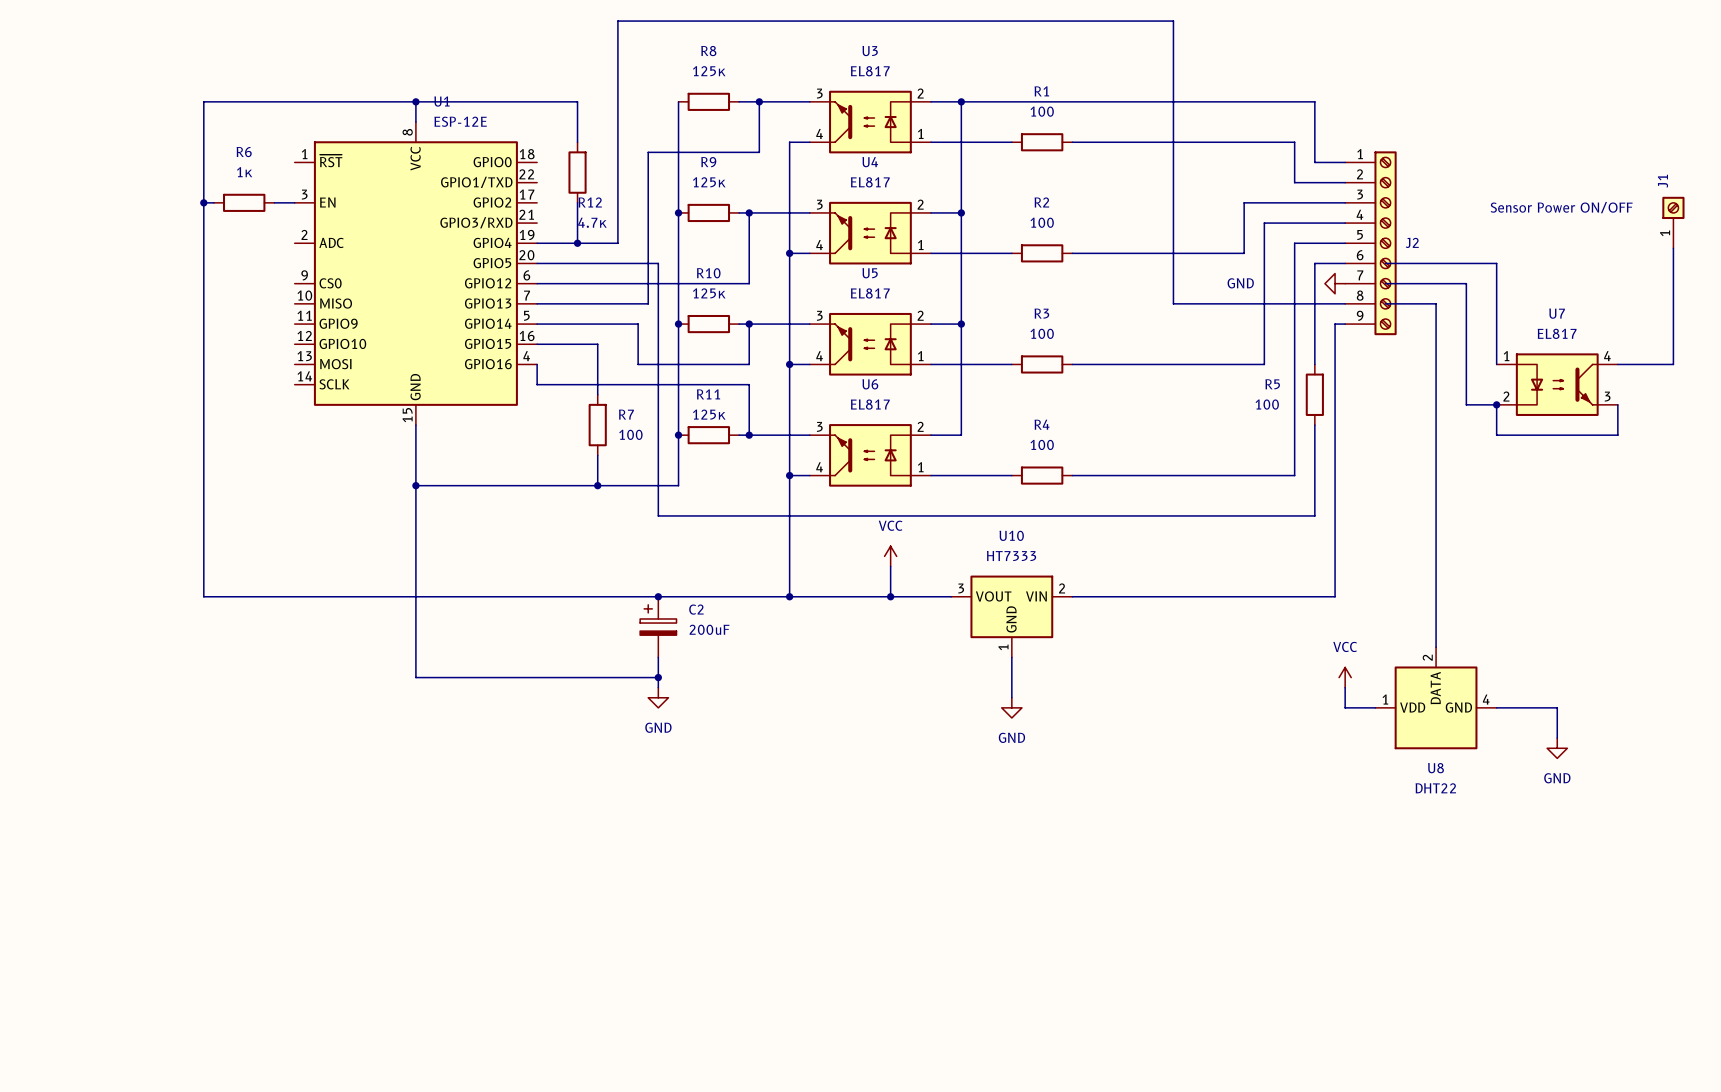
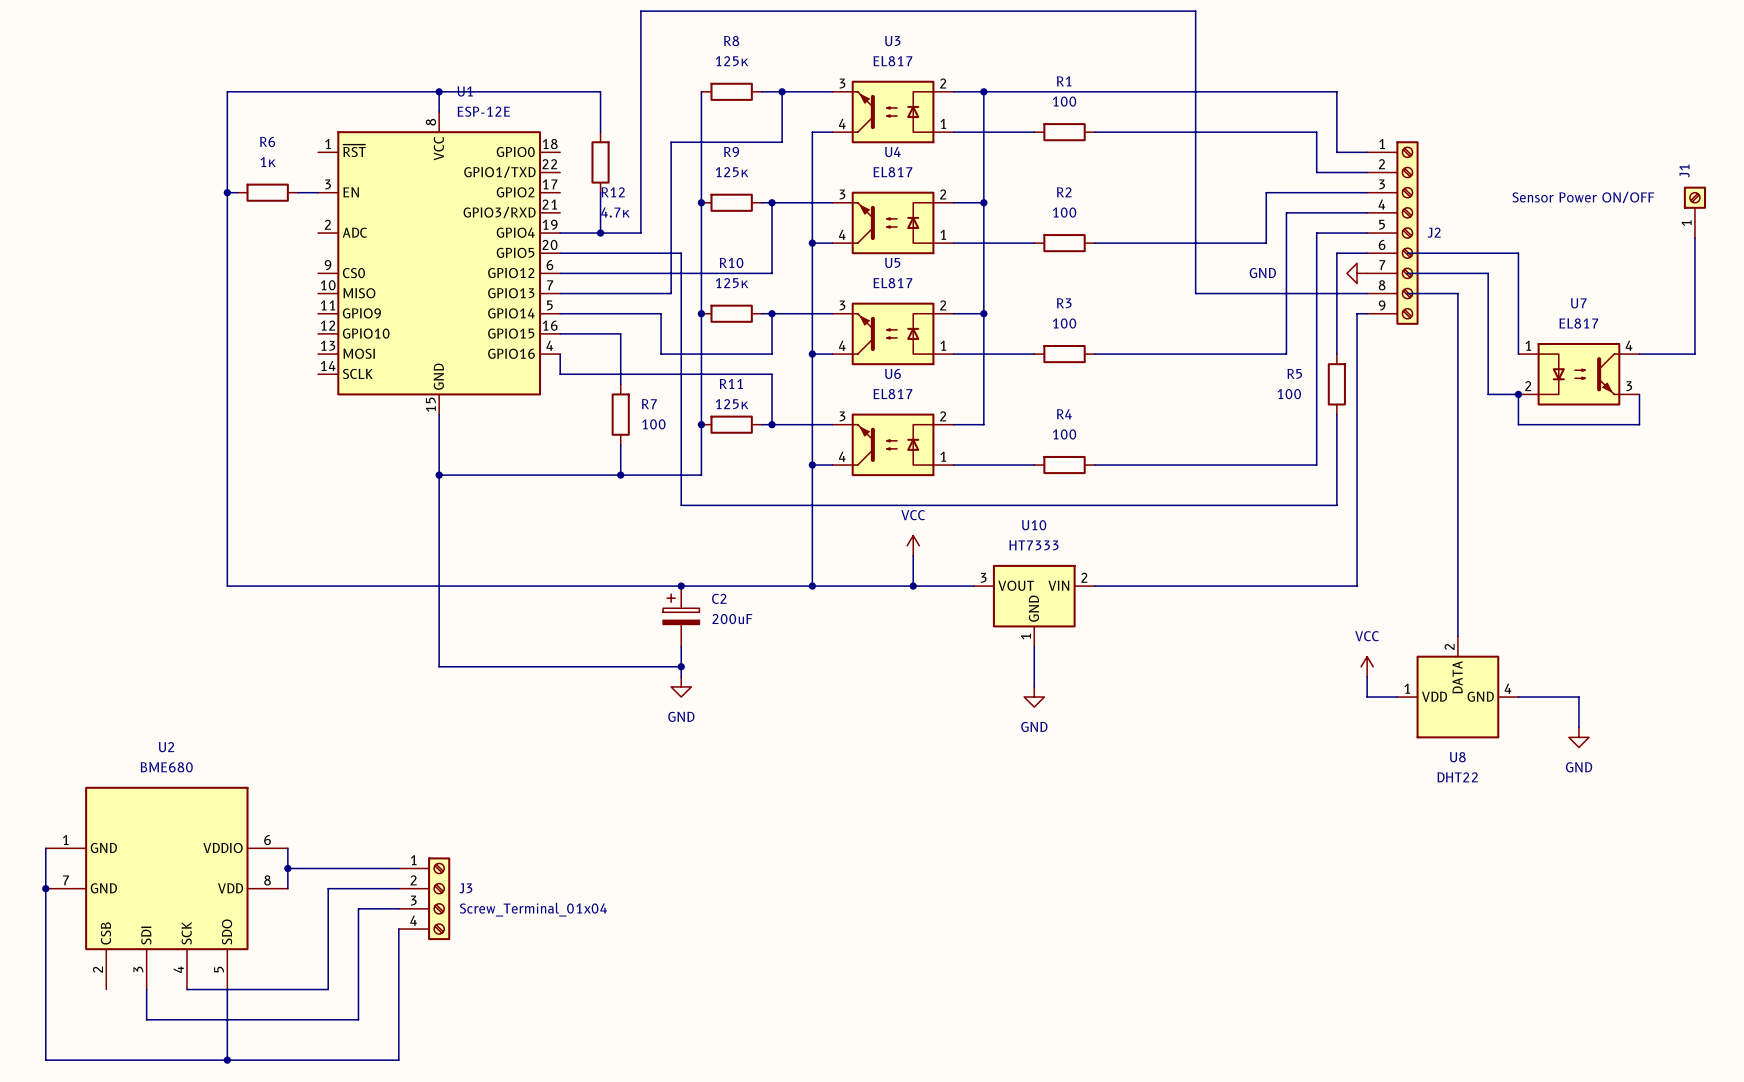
wire: none -> (45, 848) (45, 1060) (398, 1060) (398, 929)
wire: none -> (287, 848) (287, 888)
wire: none -> (287, 868) (398, 868)
junction: none -> (287, 868)
junction: none -> (45, 888)
U2: none -> BME680 (166, 888)
wire: none -> (398, 888) (328, 888) (328, 989) (186, 989)
J3: none -> Screw_Terminal_01x04 (424, 898)
wire: none -> (398, 908) (358, 908) (358, 1019) (146, 1019) (146, 989)
wire: none -> (227, 989) (227, 1060)
junction: none -> (227, 1060)

